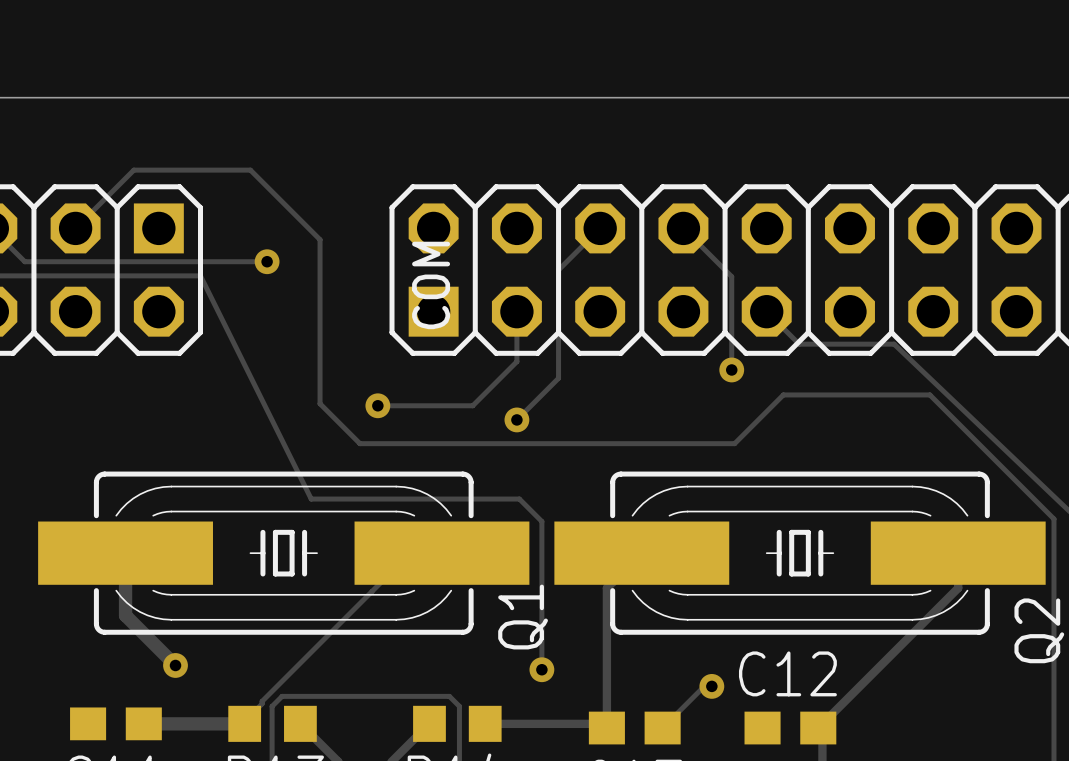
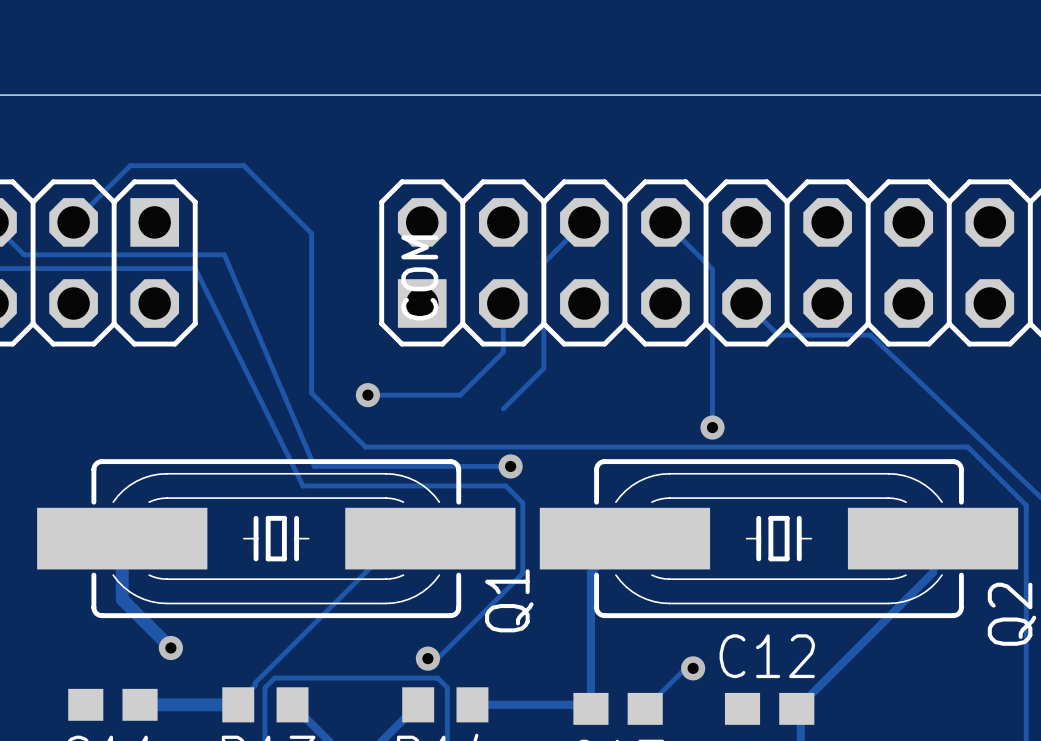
track: (230, 261) (267, 261) -> (224, 254) (314, 466) (510, 466)
via: (267, 261) -> none
track: none -> (712, 360) (712, 427)
via position: (731, 369) -> (712, 427)
via position: (516, 419) -> (510, 466)
track: (359, 443) (734, 443) (783, 394) (929, 394) (994, 459) -> (350, 432) (365, 447) (967, 447)
track: (536, 516) (541, 521) (541, 669) -> (522, 502) (522, 573) (437, 658) (427, 658)
via: (541, 669) -> none
via: none -> (427, 658)

